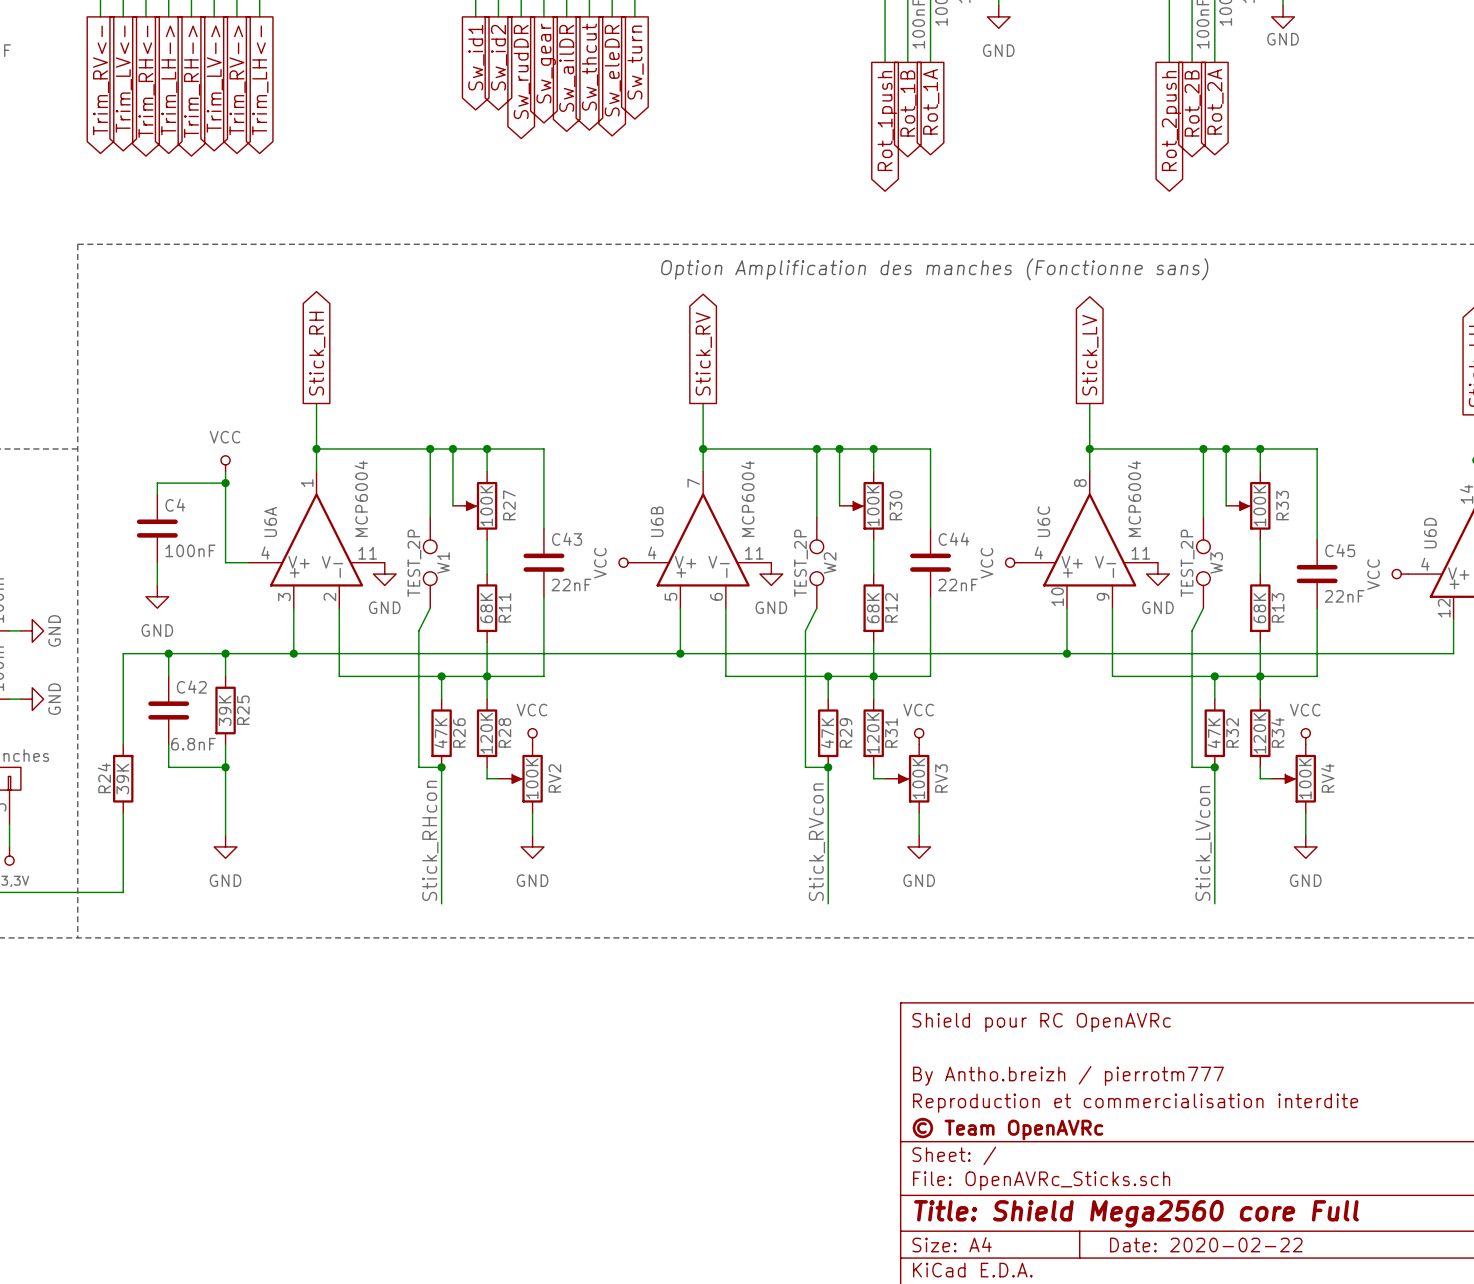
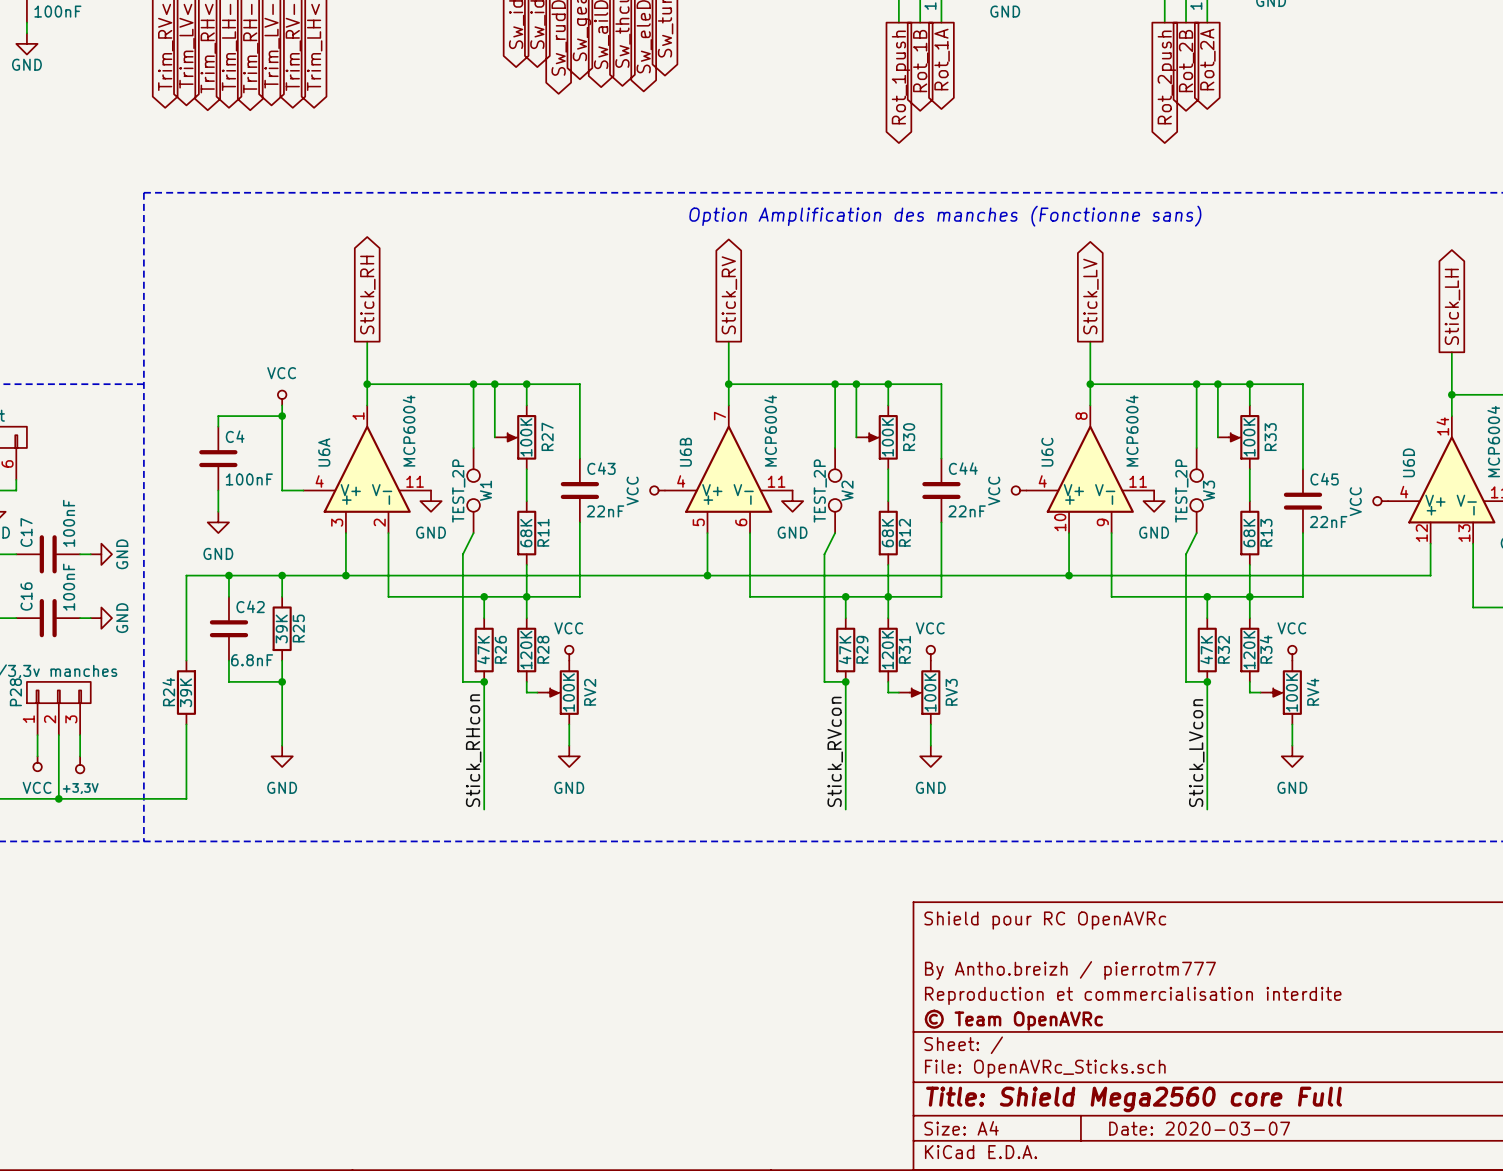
title block: Date: 2020-02-22 (1206, 1245) -> Date: 2020-03-07 (1199, 1128)

